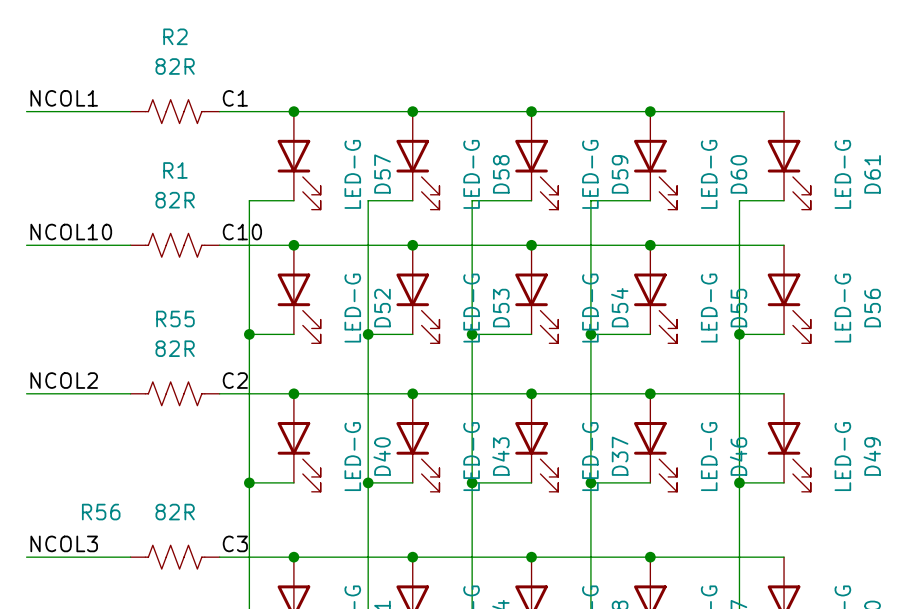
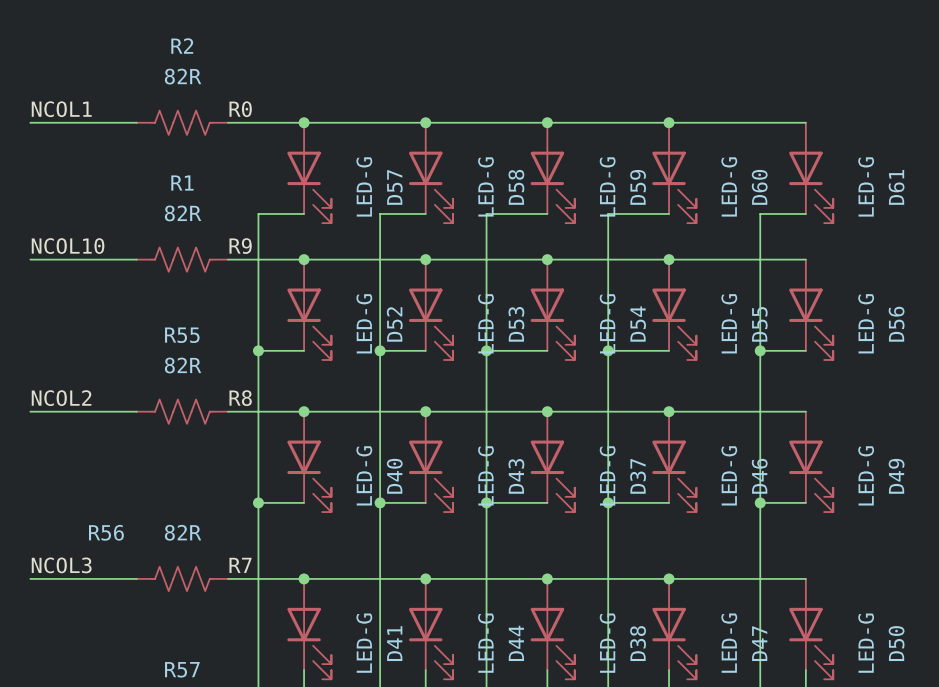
label: C1 (235, 98) -> R0 (240, 109)
label: C10 (242, 232) -> R9 (240, 246)
label: C2 (235, 380) -> R8 (240, 398)
label: C3 (235, 543) -> R7 (240, 565)

